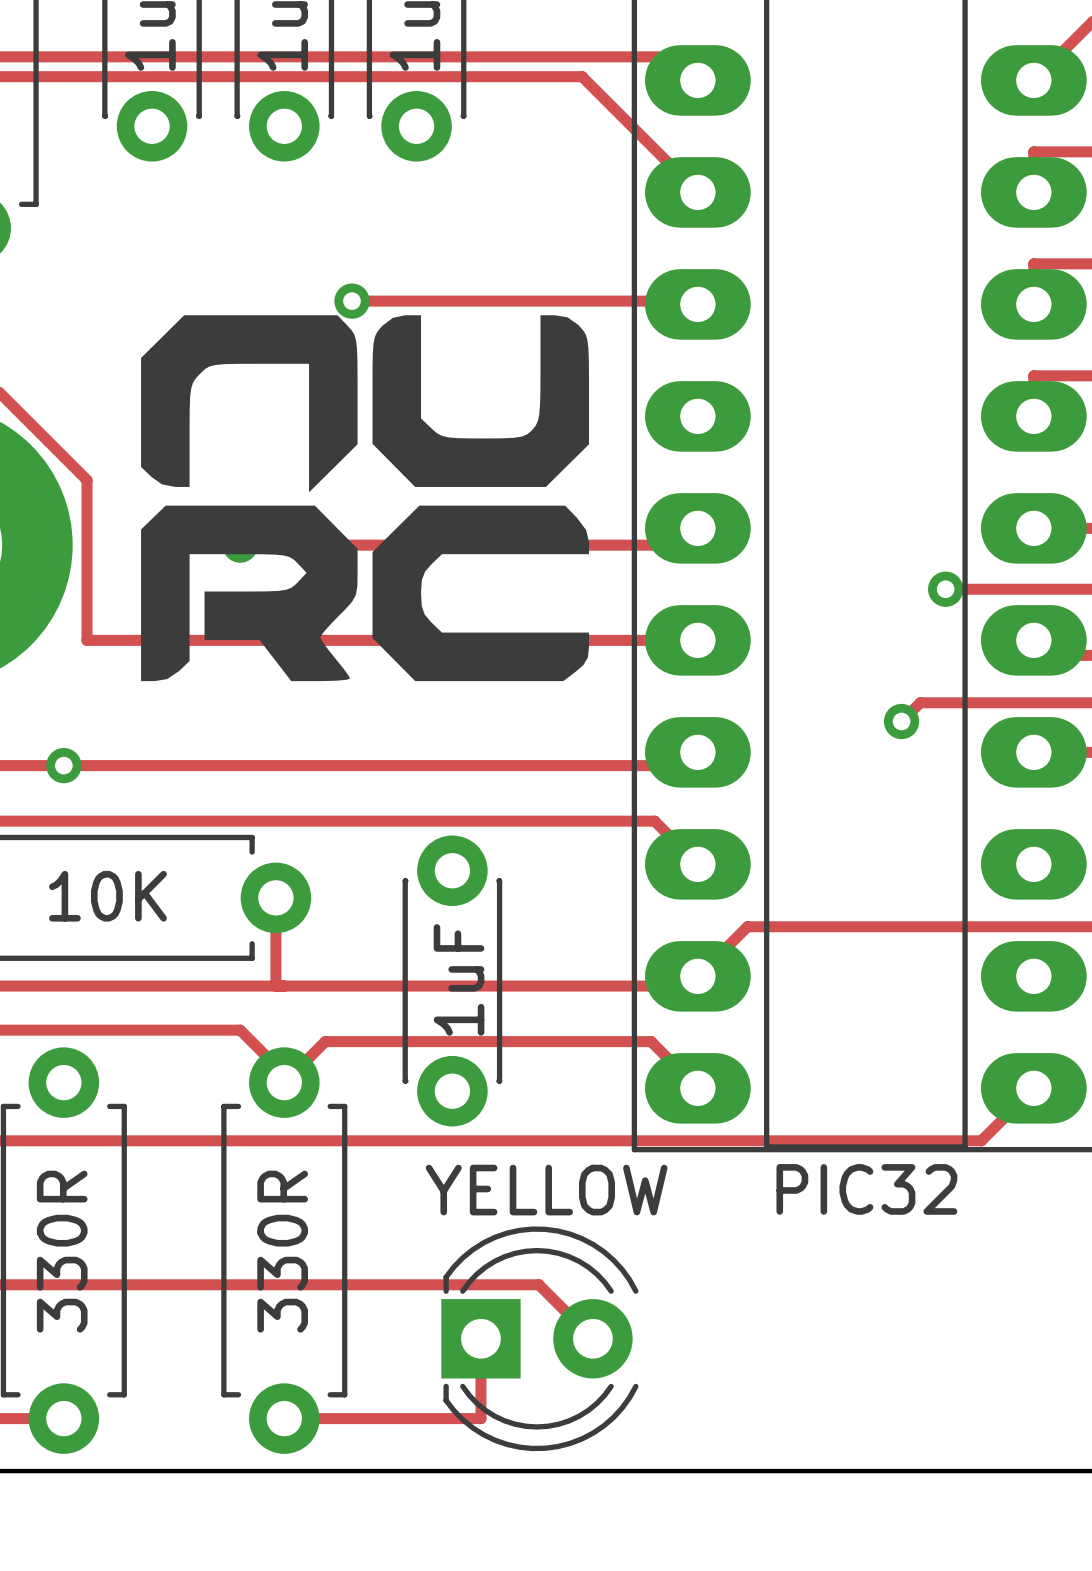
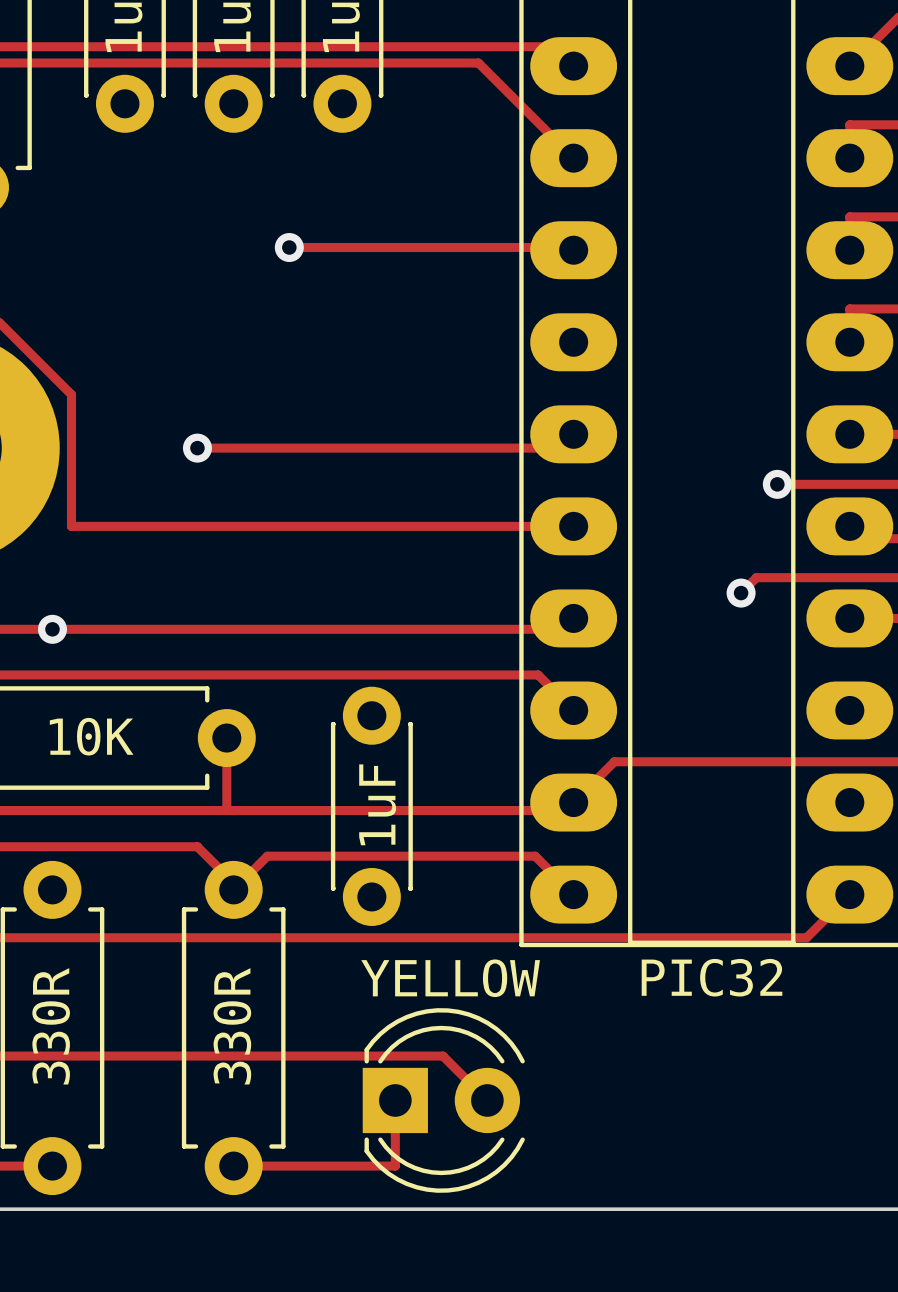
drawing: [141, 315, 590, 682] -> none

